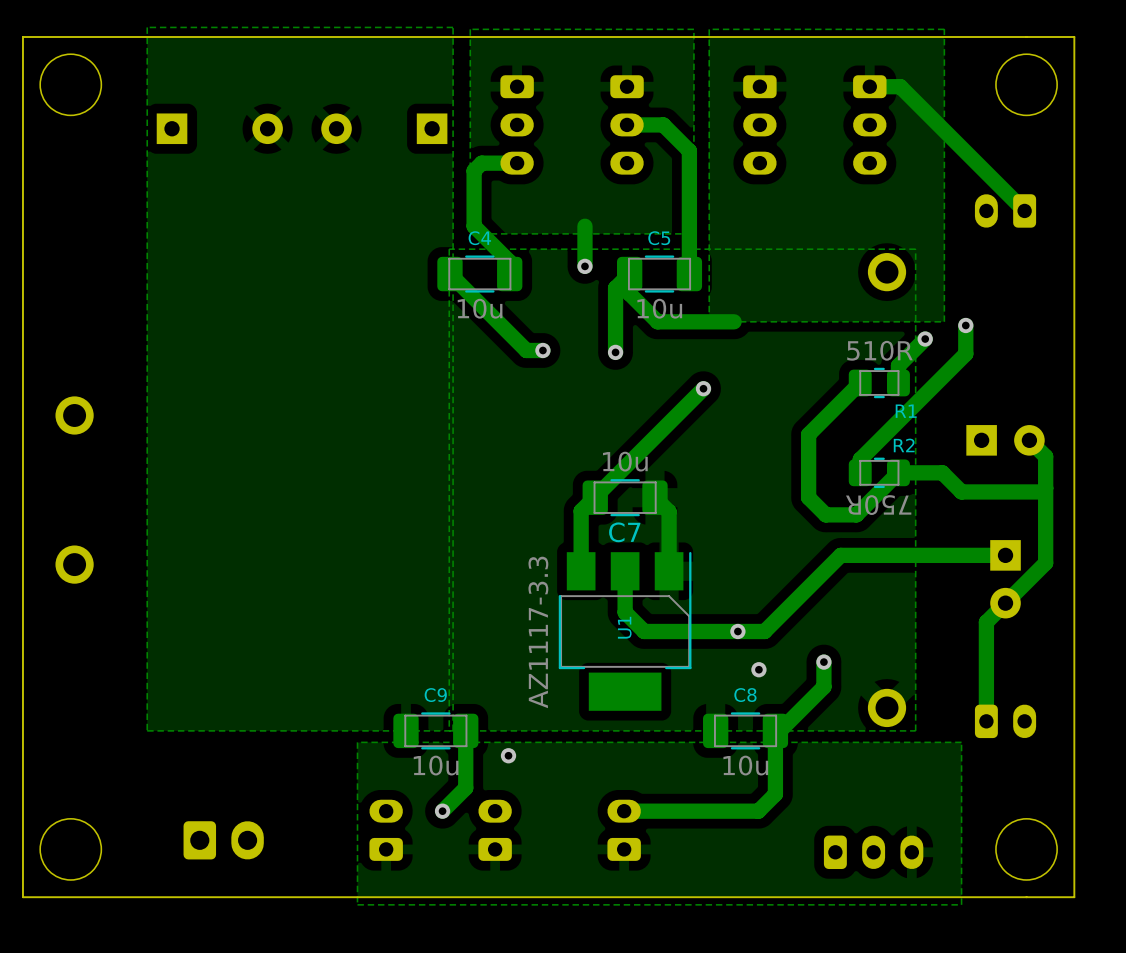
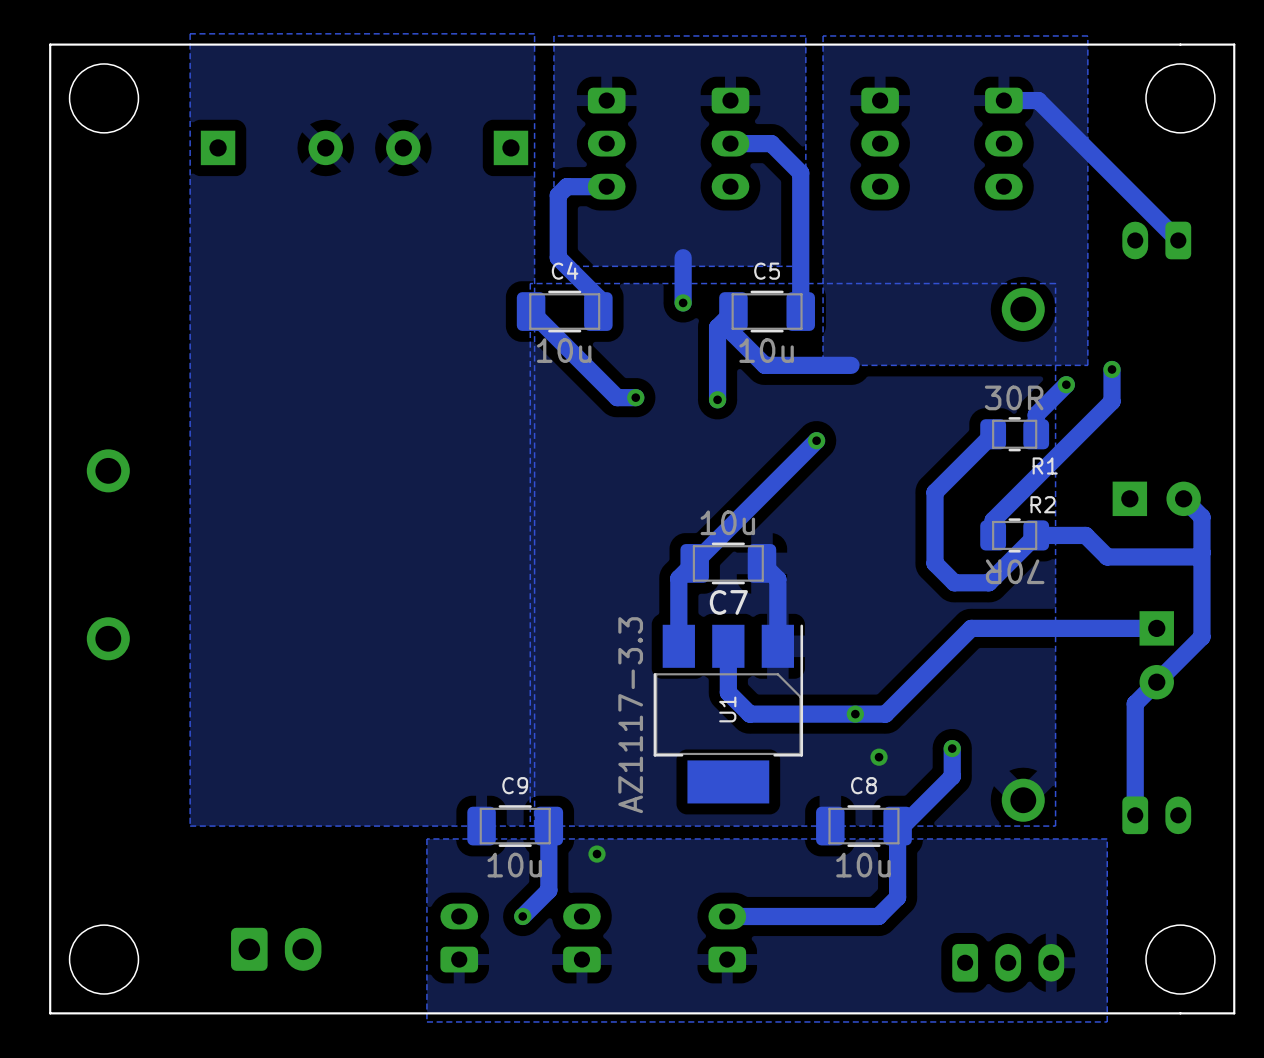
R1 value: 510R (879, 350) -> 30R (1014, 397)
R2 value: 750R (878, 505) -> 70R (1015, 571)

